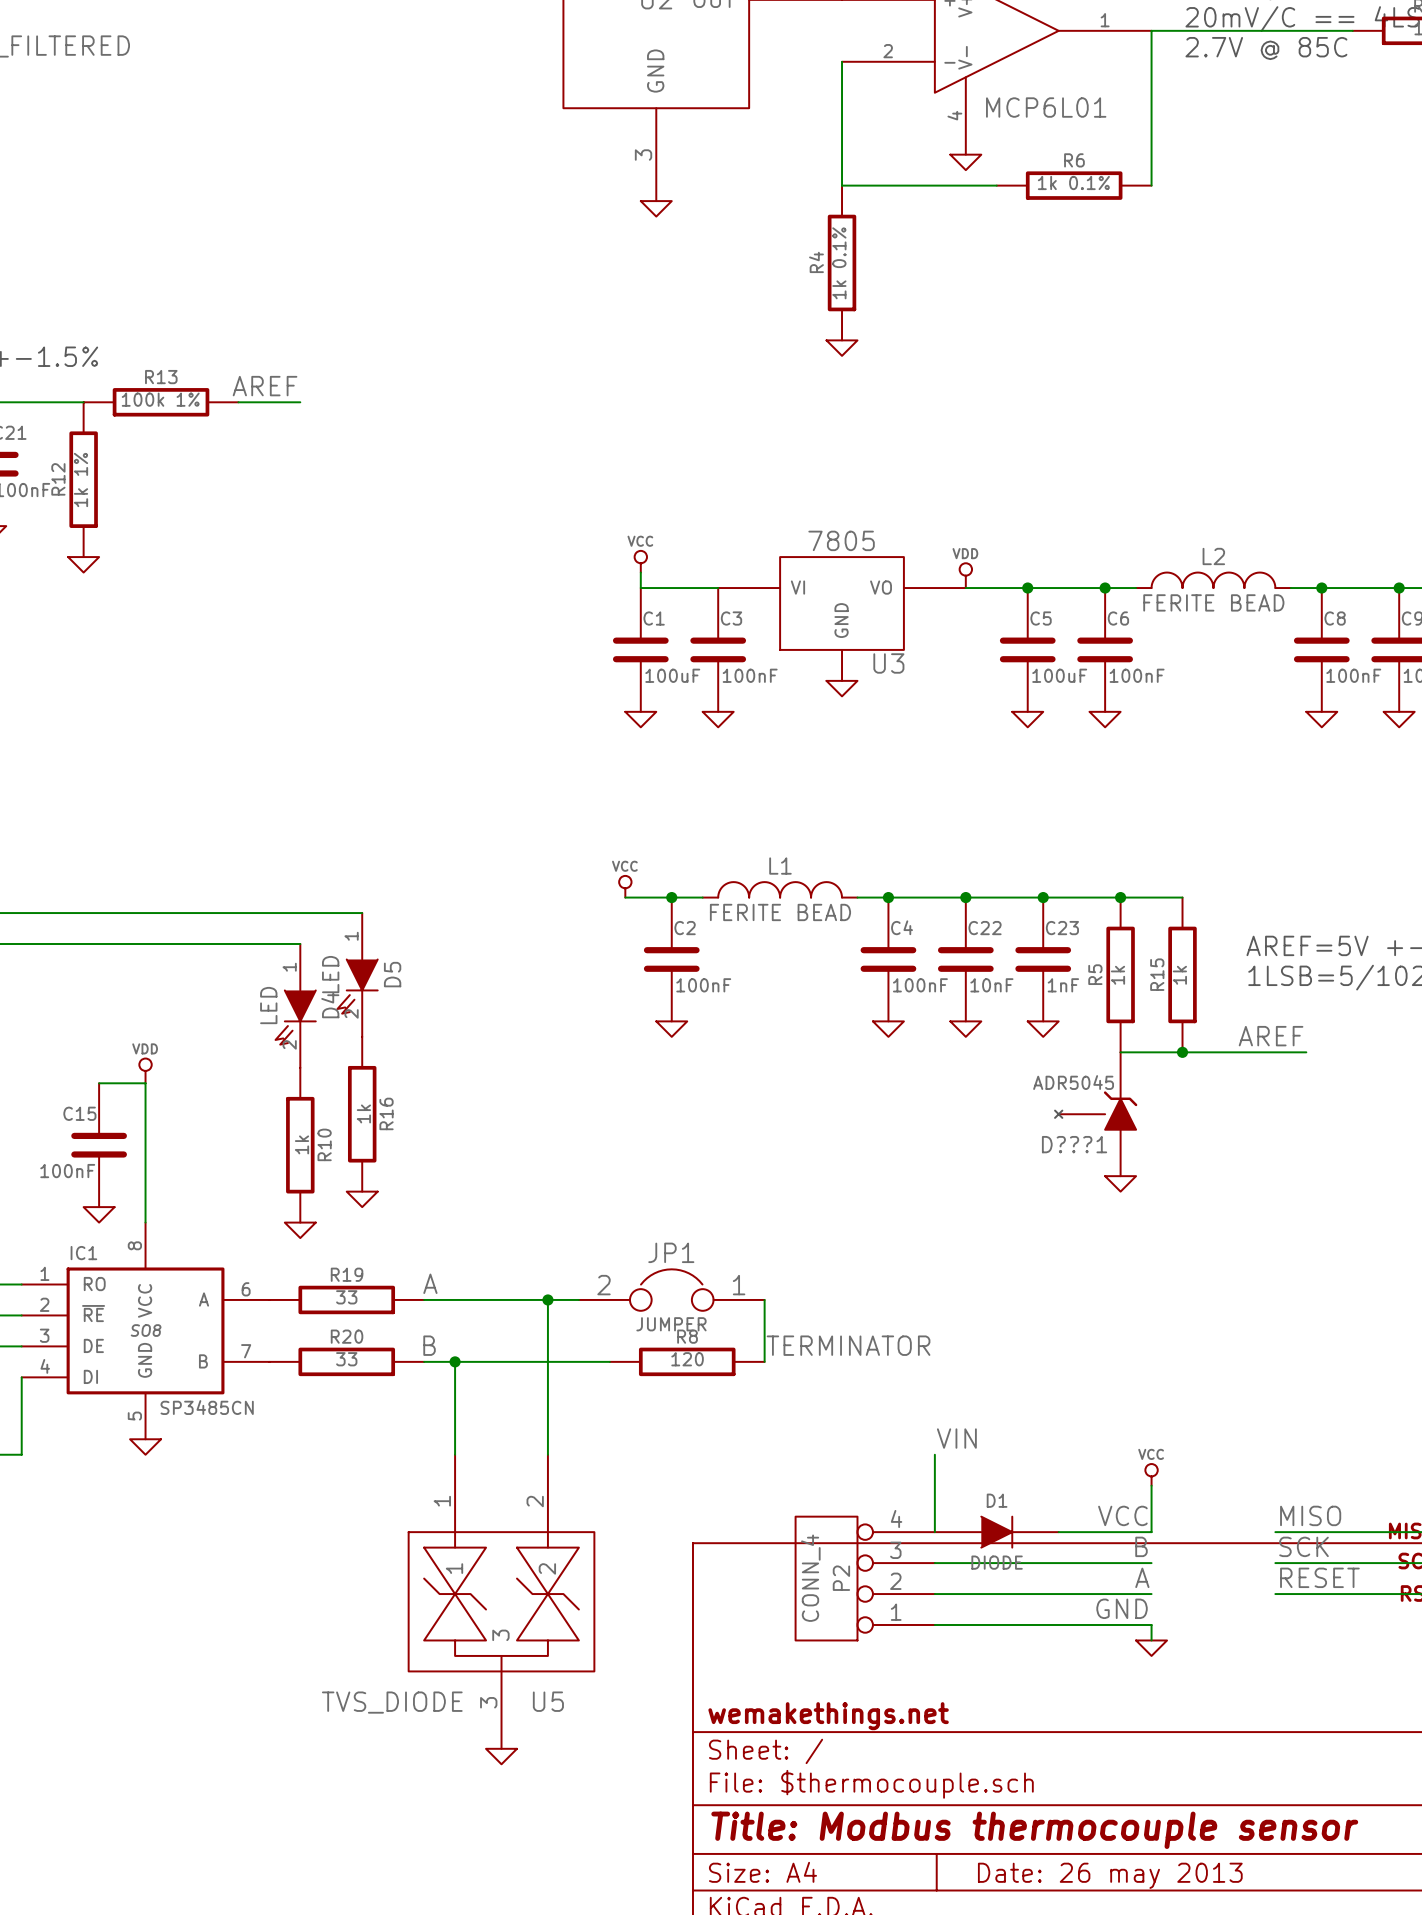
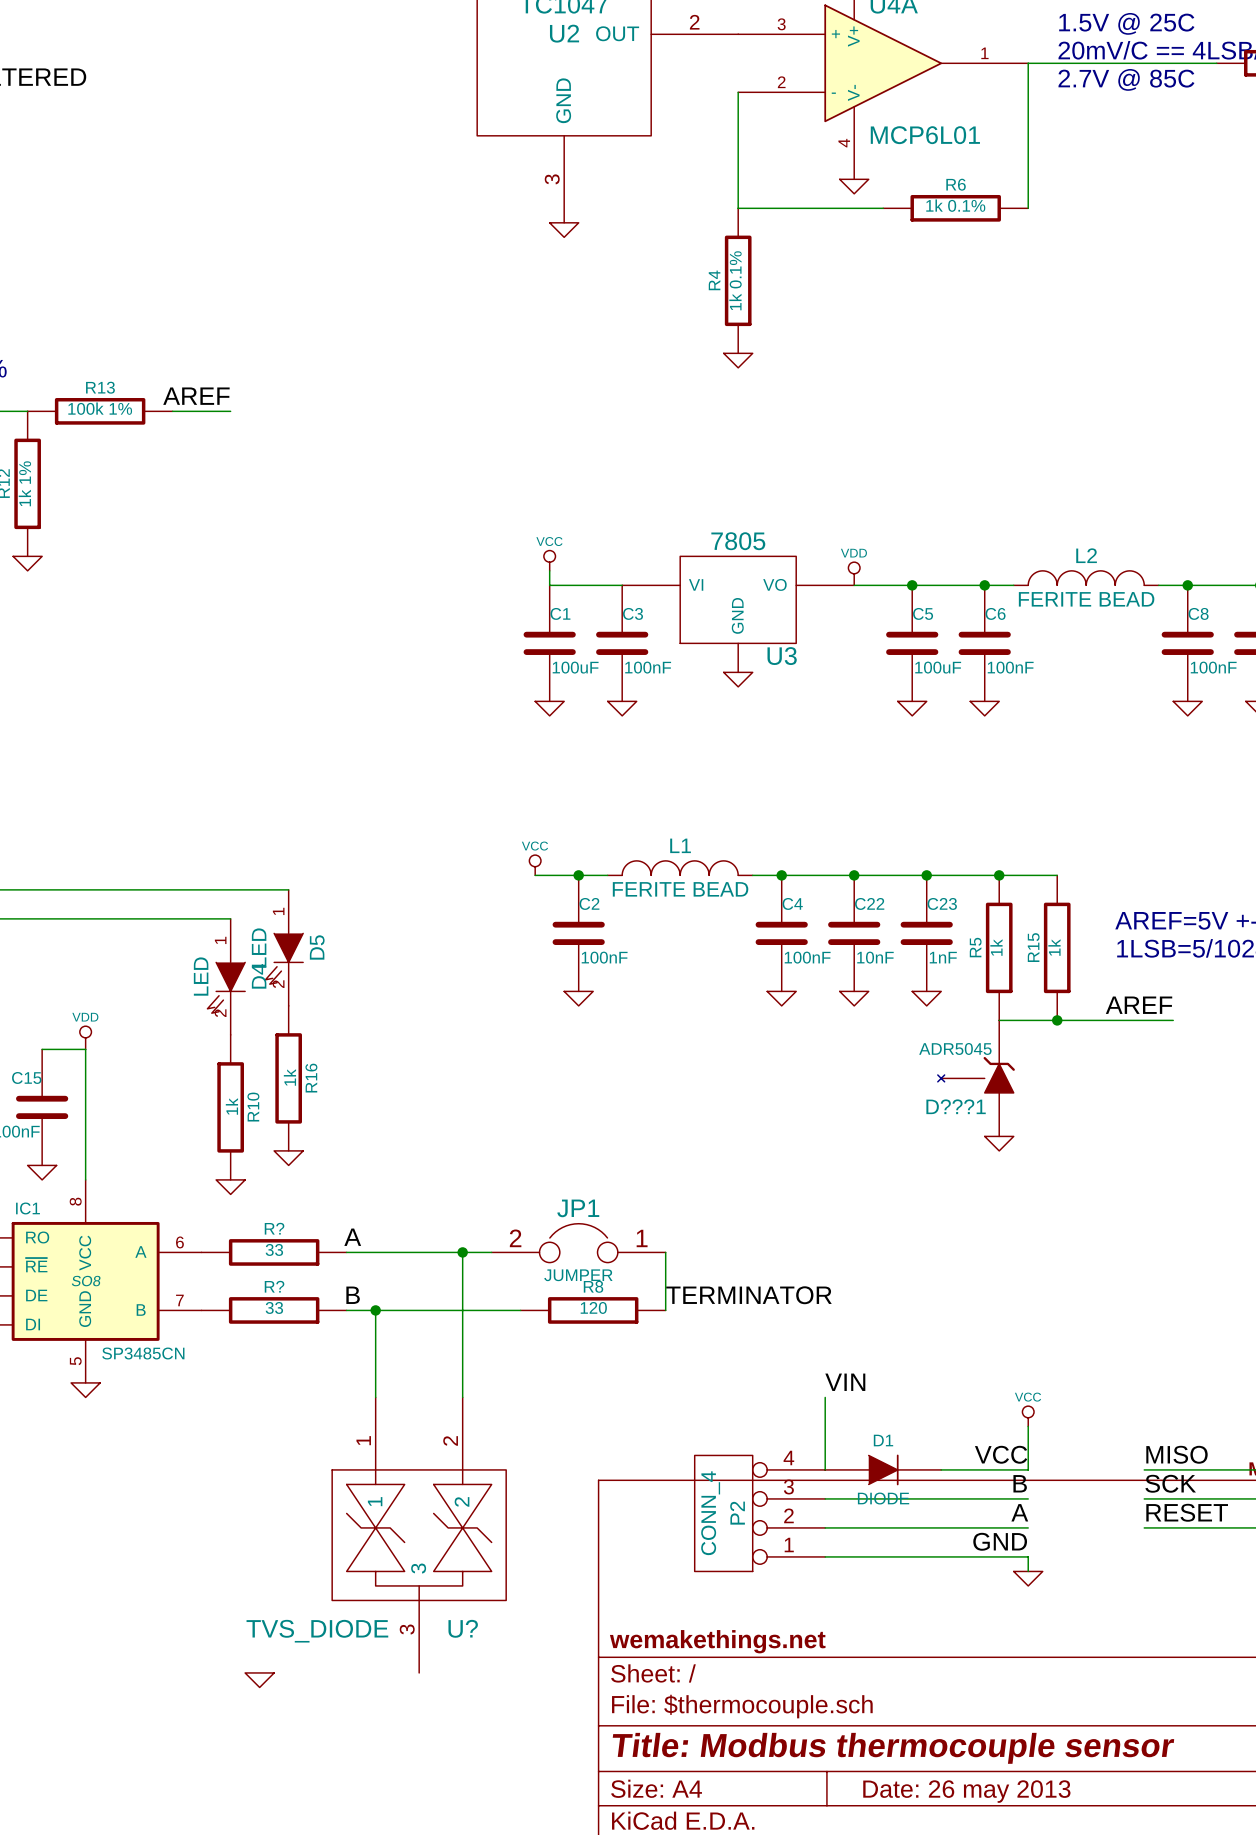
R19 name: R19 (347, 1274) -> R? (274, 1228)
R20 name: R20 (347, 1336) -> R? (274, 1286)
U5 name: U5 (548, 1701) -> U? (463, 1628)
power symbol position: (501, 1756) -> (259, 1680)

